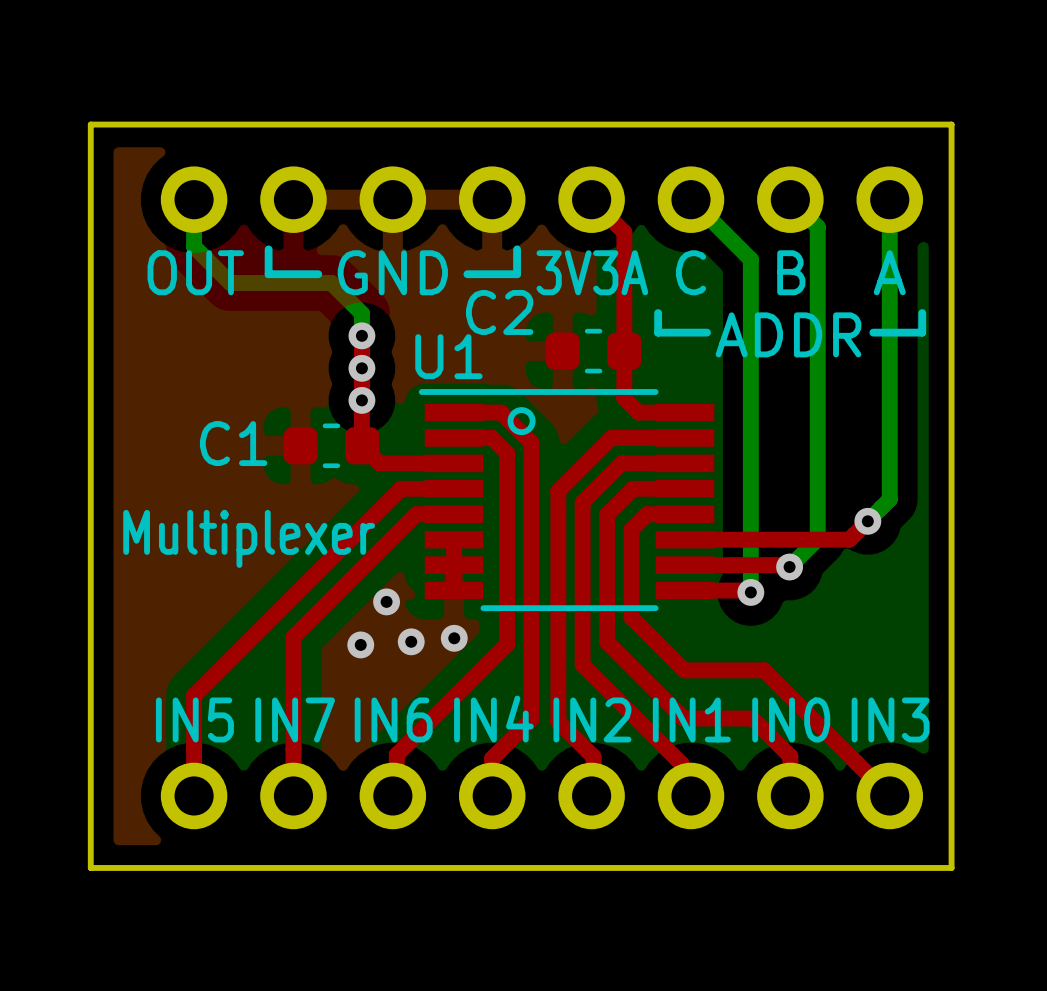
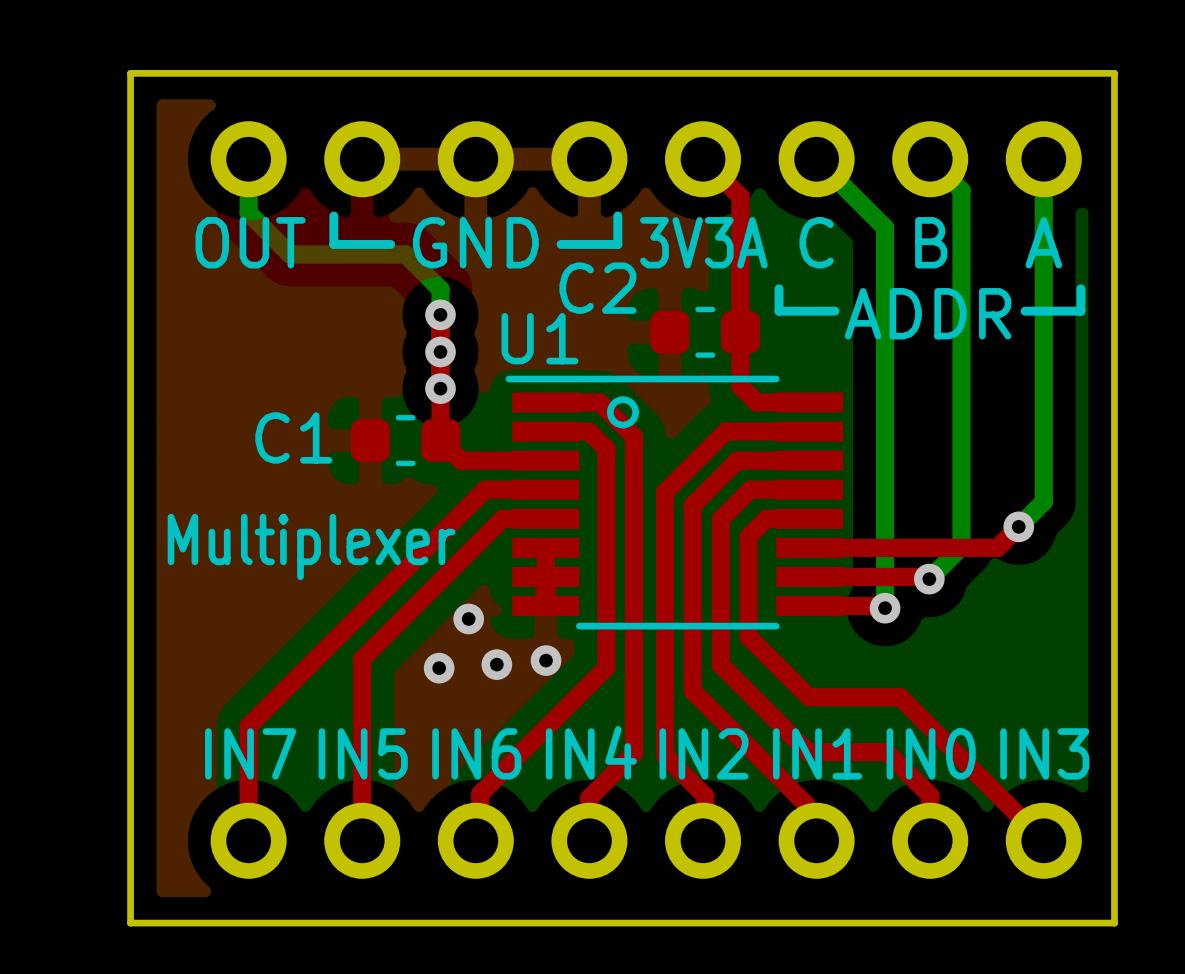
text: IN5 (194, 719) -> IN7 (250, 753)
text: IN7 (295, 719) -> IN5 (363, 753)

